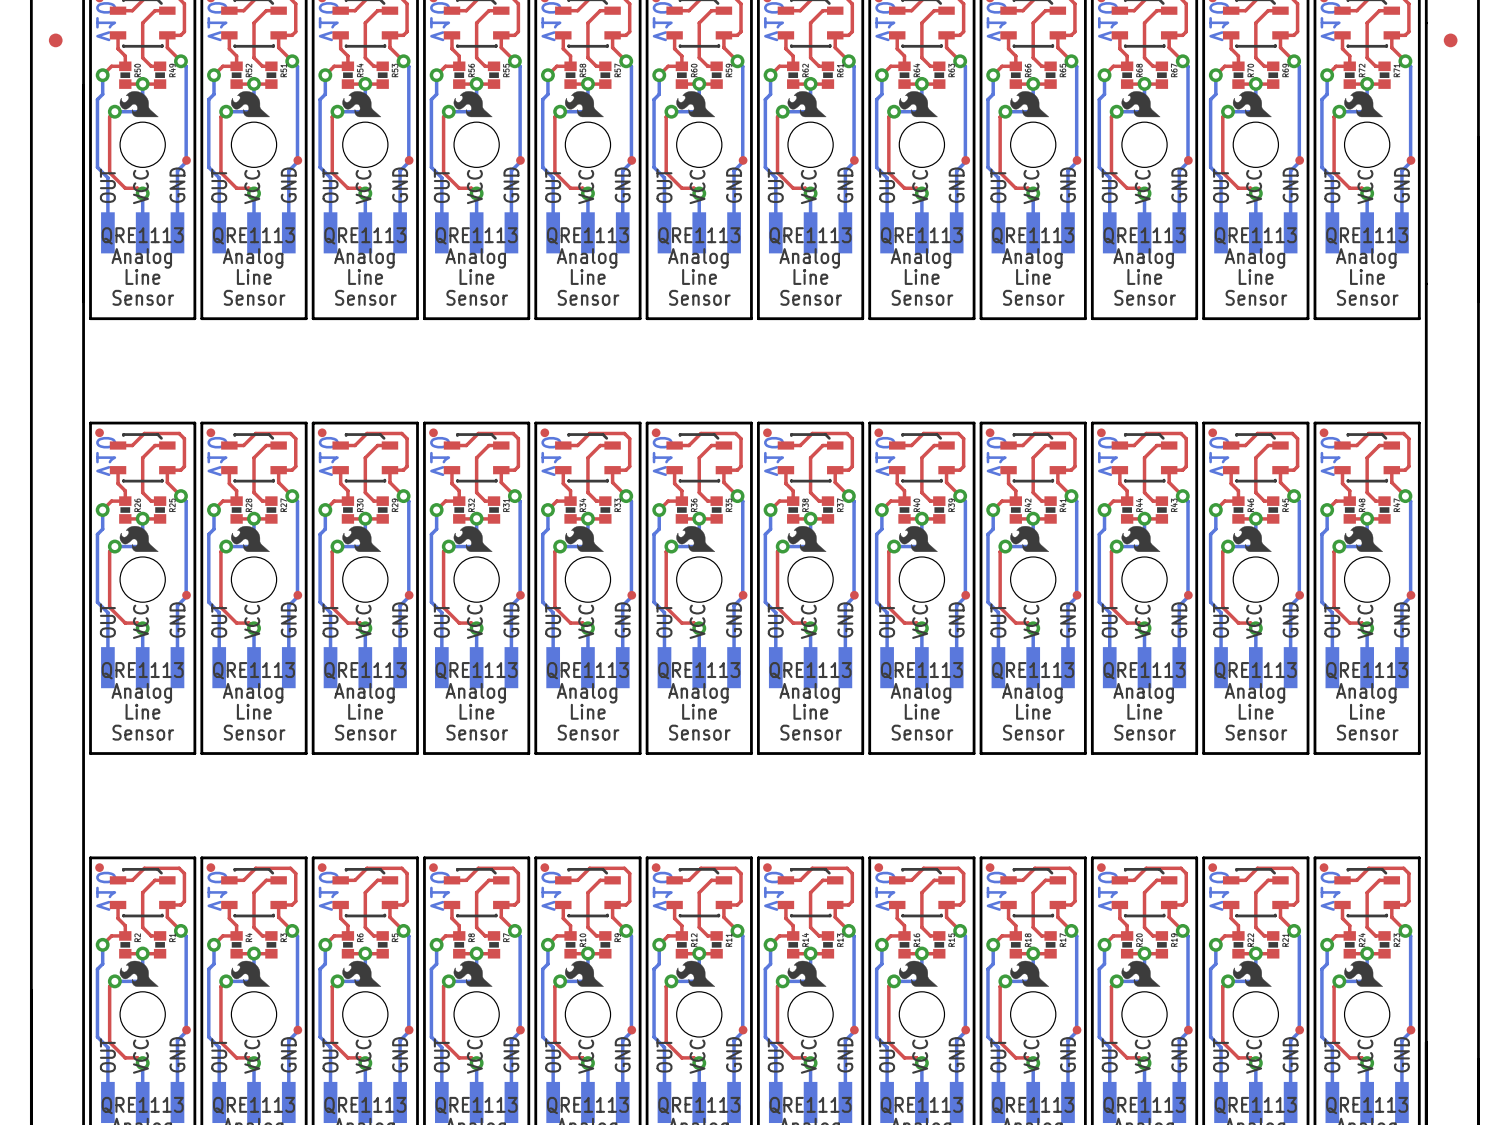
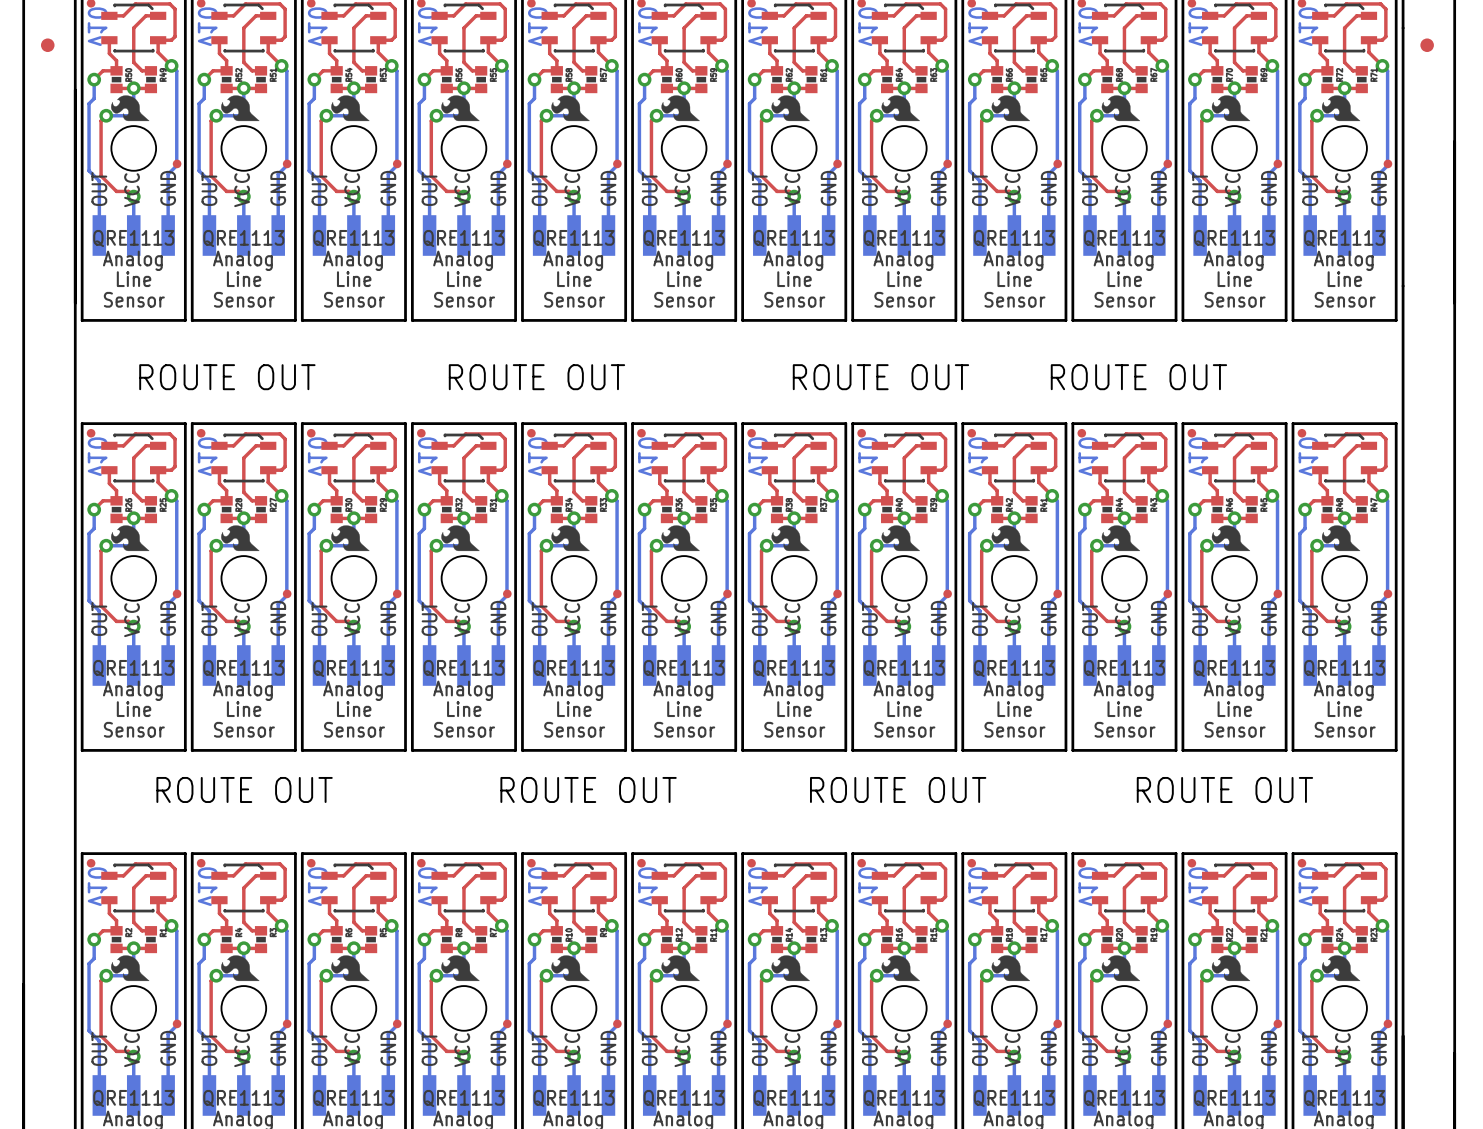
text: none -> ROUTE OUT (227, 377)
text: none -> ROUTE OUT (536, 377)
text: none -> ROUTE OUT (880, 377)
text: none -> ROUTE OUT (1138, 377)
text: none -> ROUTE OUT (244, 789)
text: none -> ROUTE OUT (588, 789)
text: none -> ROUTE OUT (898, 789)
text: none -> ROUTE OUT (1224, 789)

